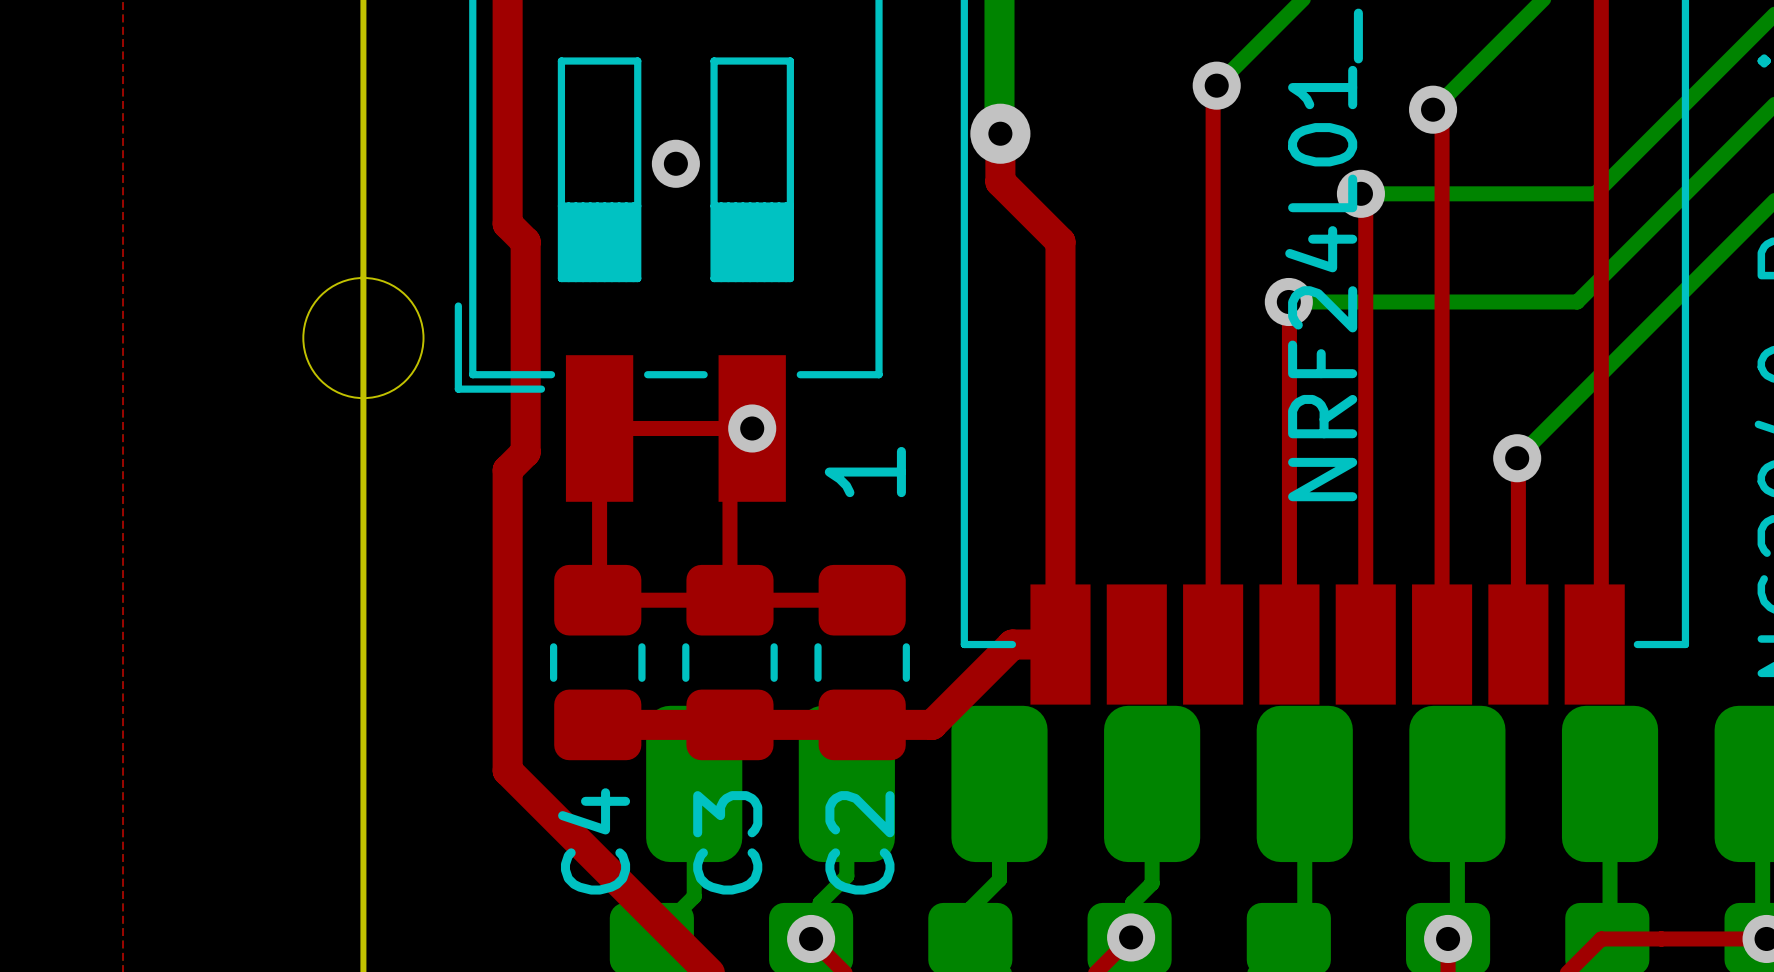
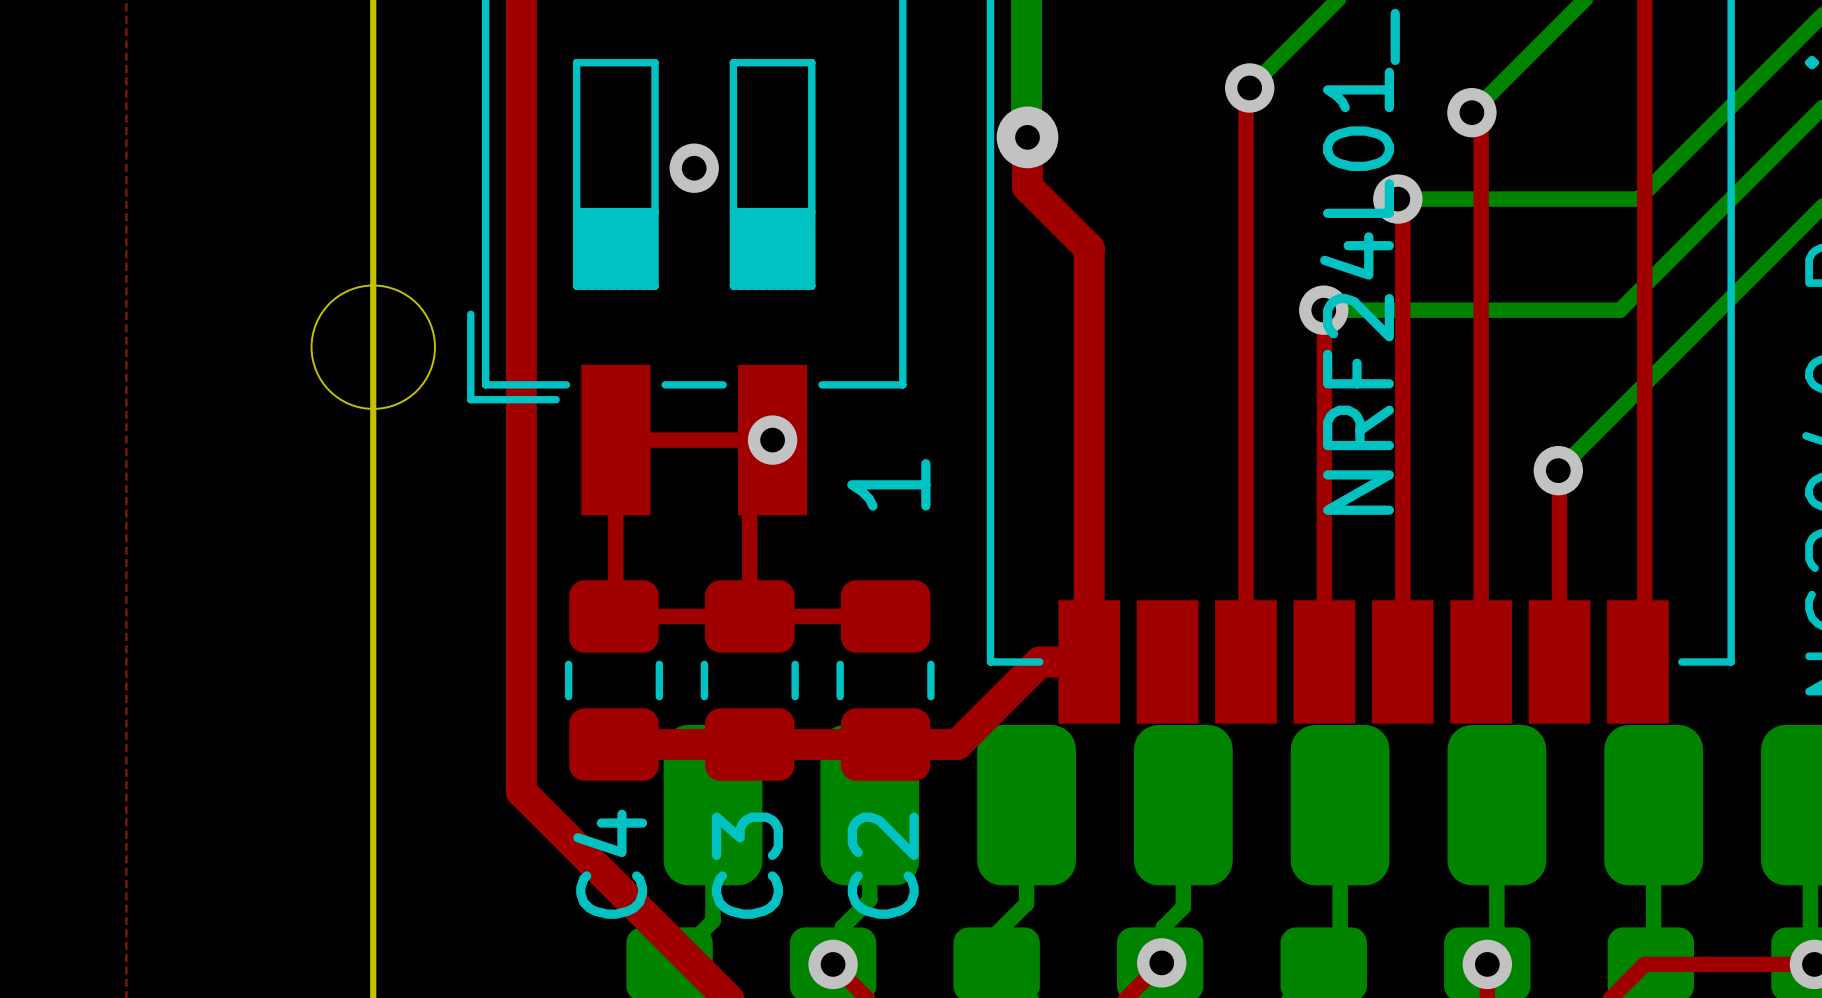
top track: (507, 223) (525, 241) (525, 452) (507, 470) -> (521, 229) (521, 483)

